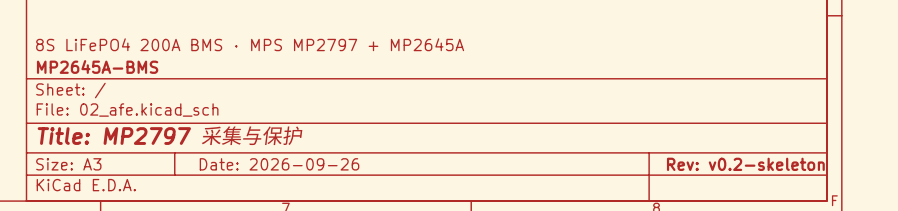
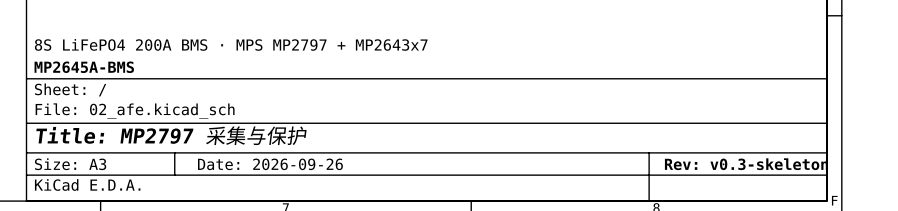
title block: 8S LiFePO4 200A BMS · MPS MP2797 + MP2645A (250, 44) -> 8S LiFePO4 200A BMS · MPS MP2797 + MP2643x7 (231, 44)
title block: Rev: v0.2-skeleton (745, 164) -> Rev: v0.3-skeleton (746, 164)

